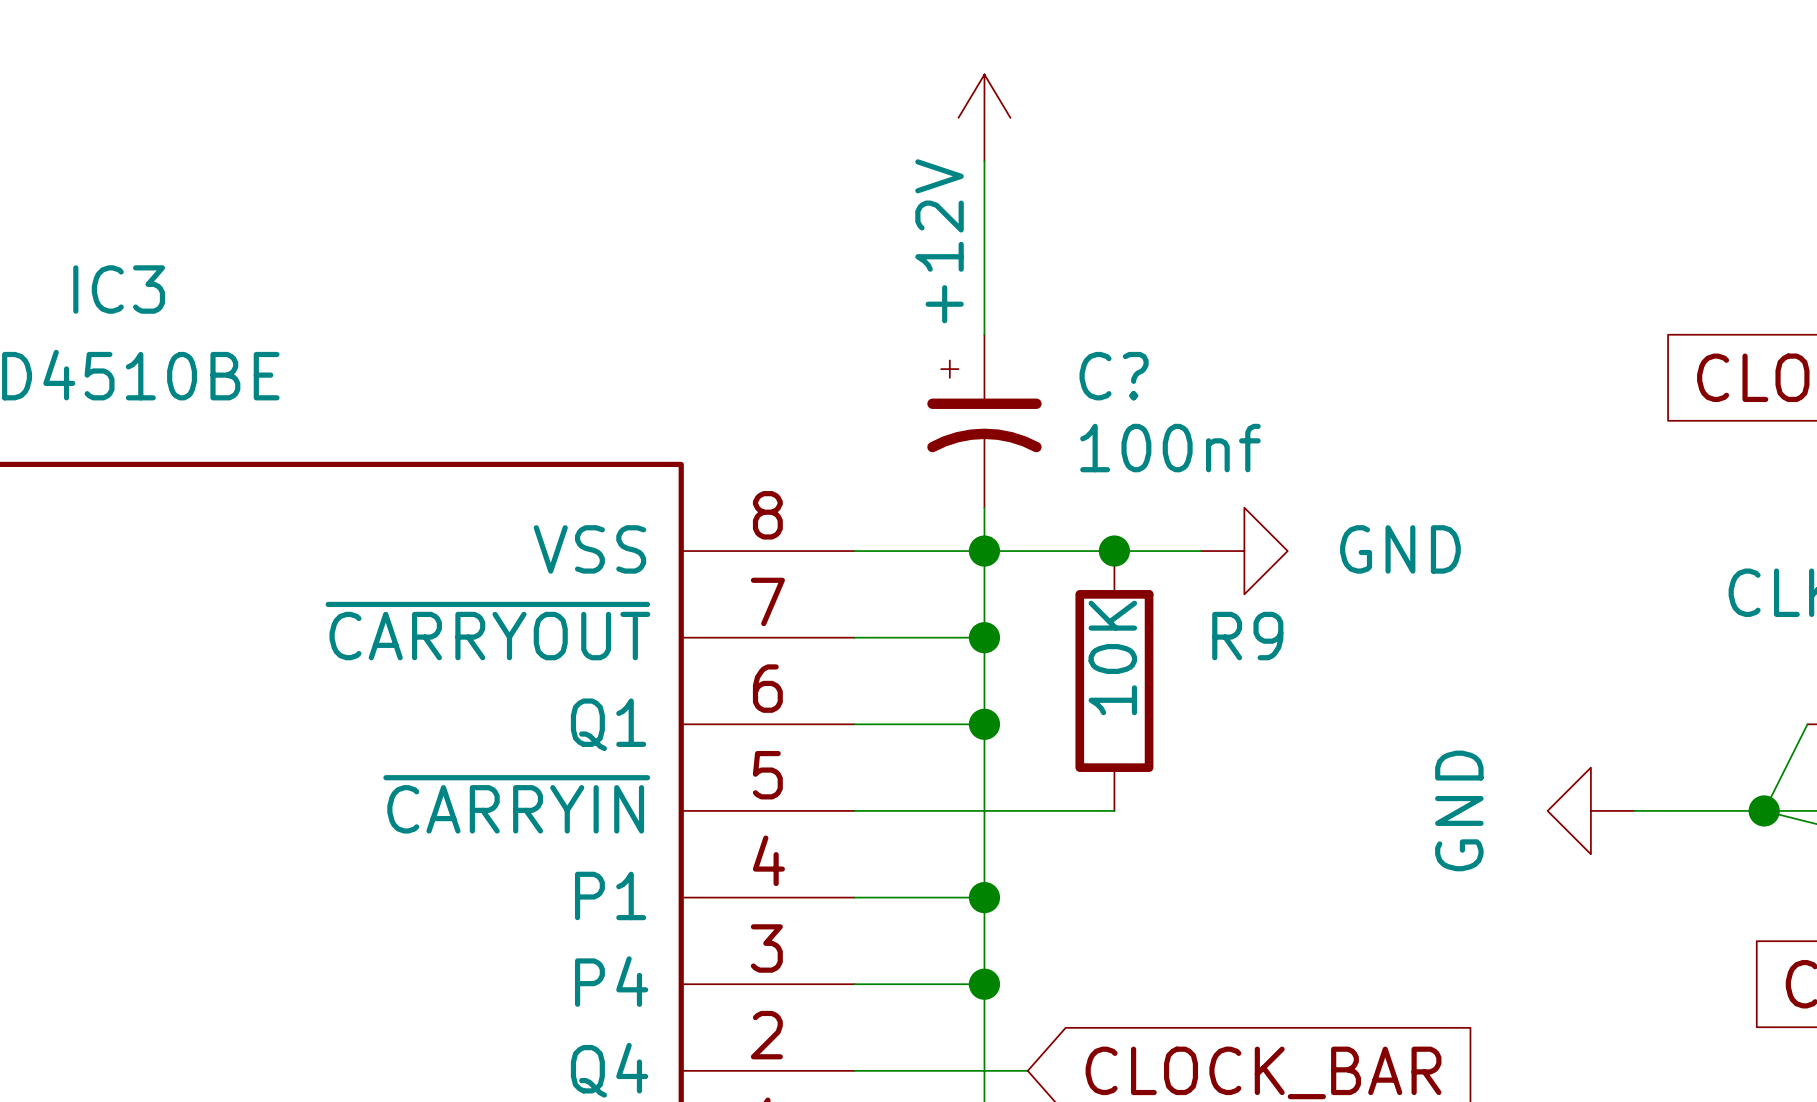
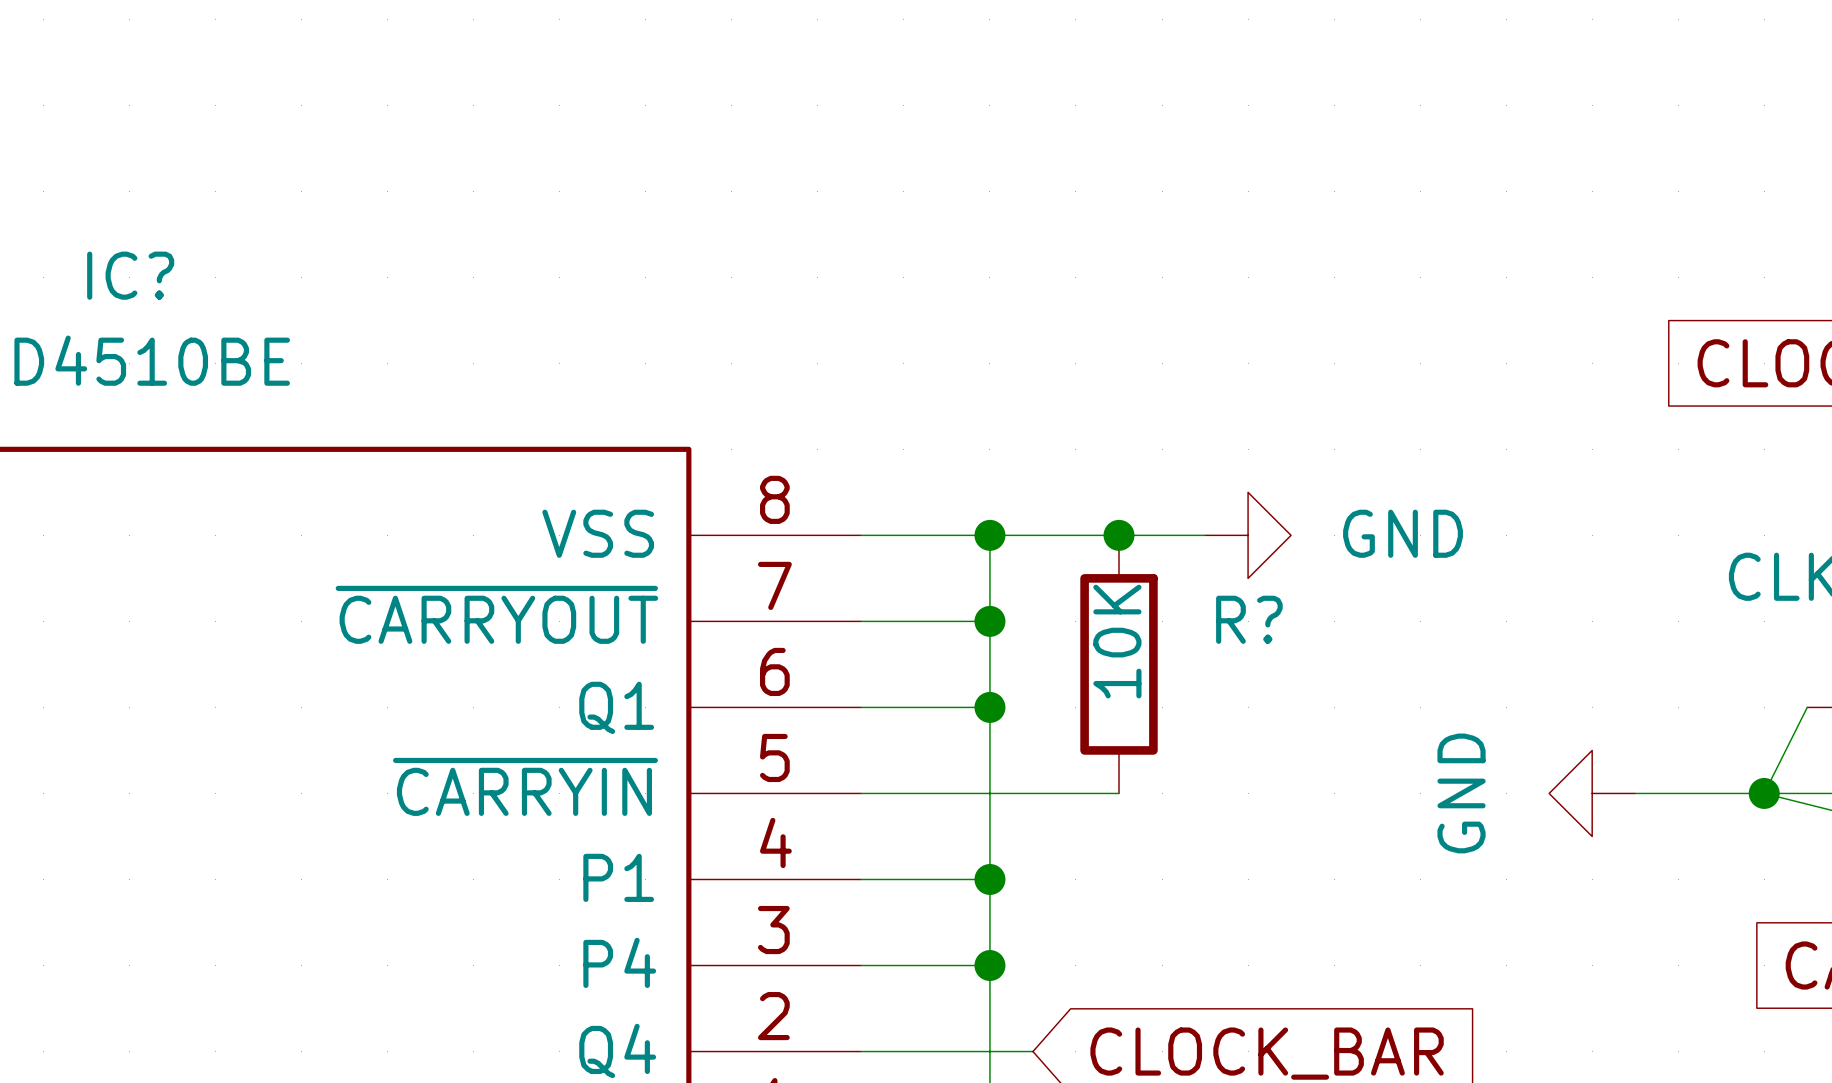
power symbol: +12V (984, 117) -> none
wire: (984, 161) (984, 334) -> none
IC3 name: IC3 (119, 289) -> IC? (130, 275)
C?: 100nf (984, 421) -> none
wire: (984, 507) (984, 551) -> none
R9 name: R9 (1247, 636) -> R? (1249, 619)

